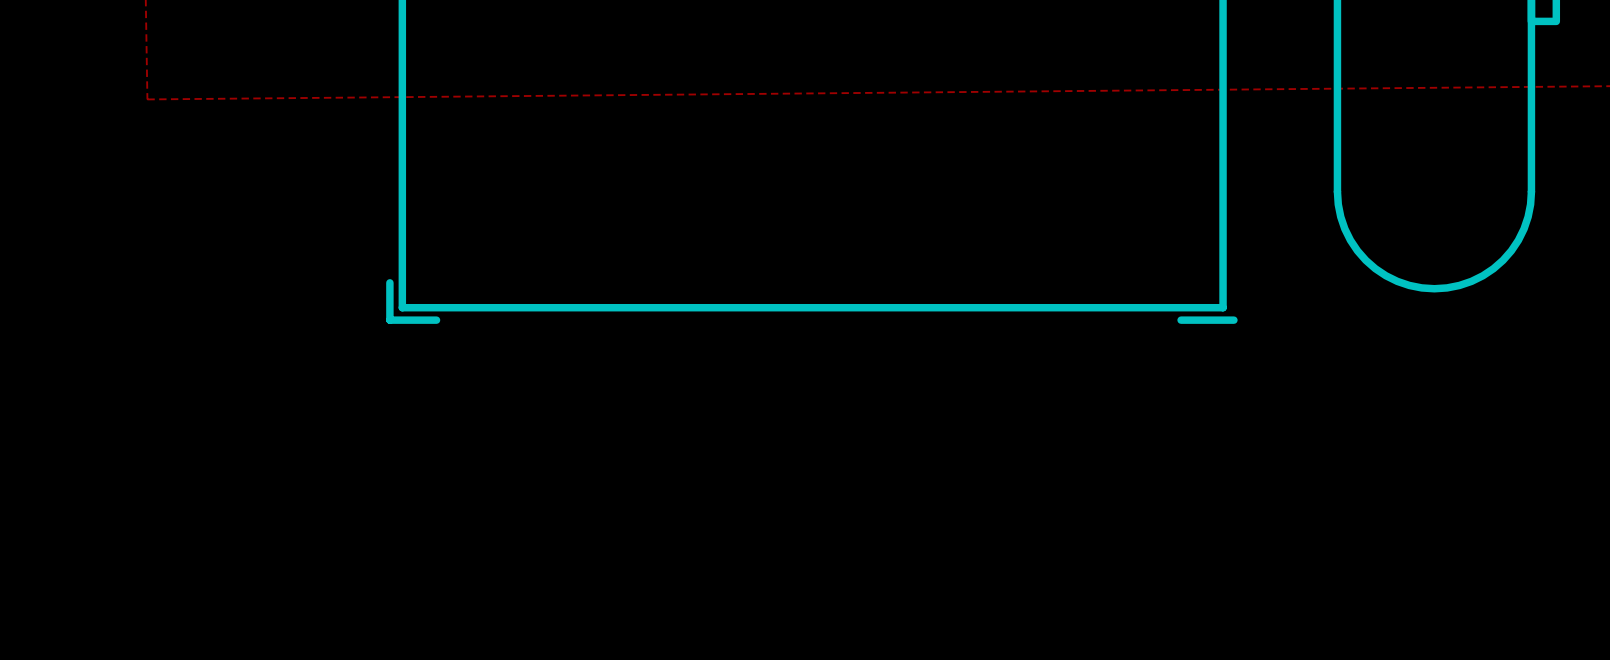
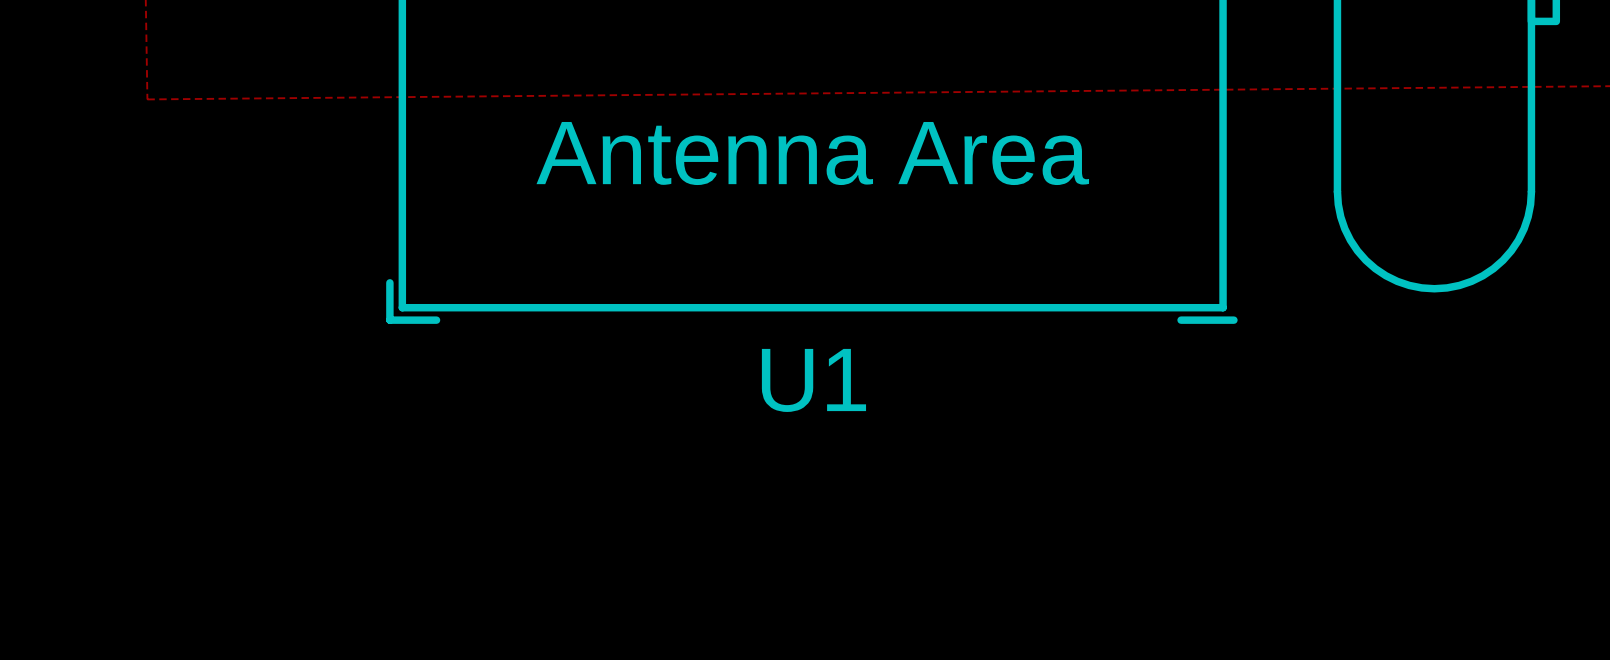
U1 text: none -> Antenna Area (812, 153)
U1 name: none -> U1 (813, 380)

